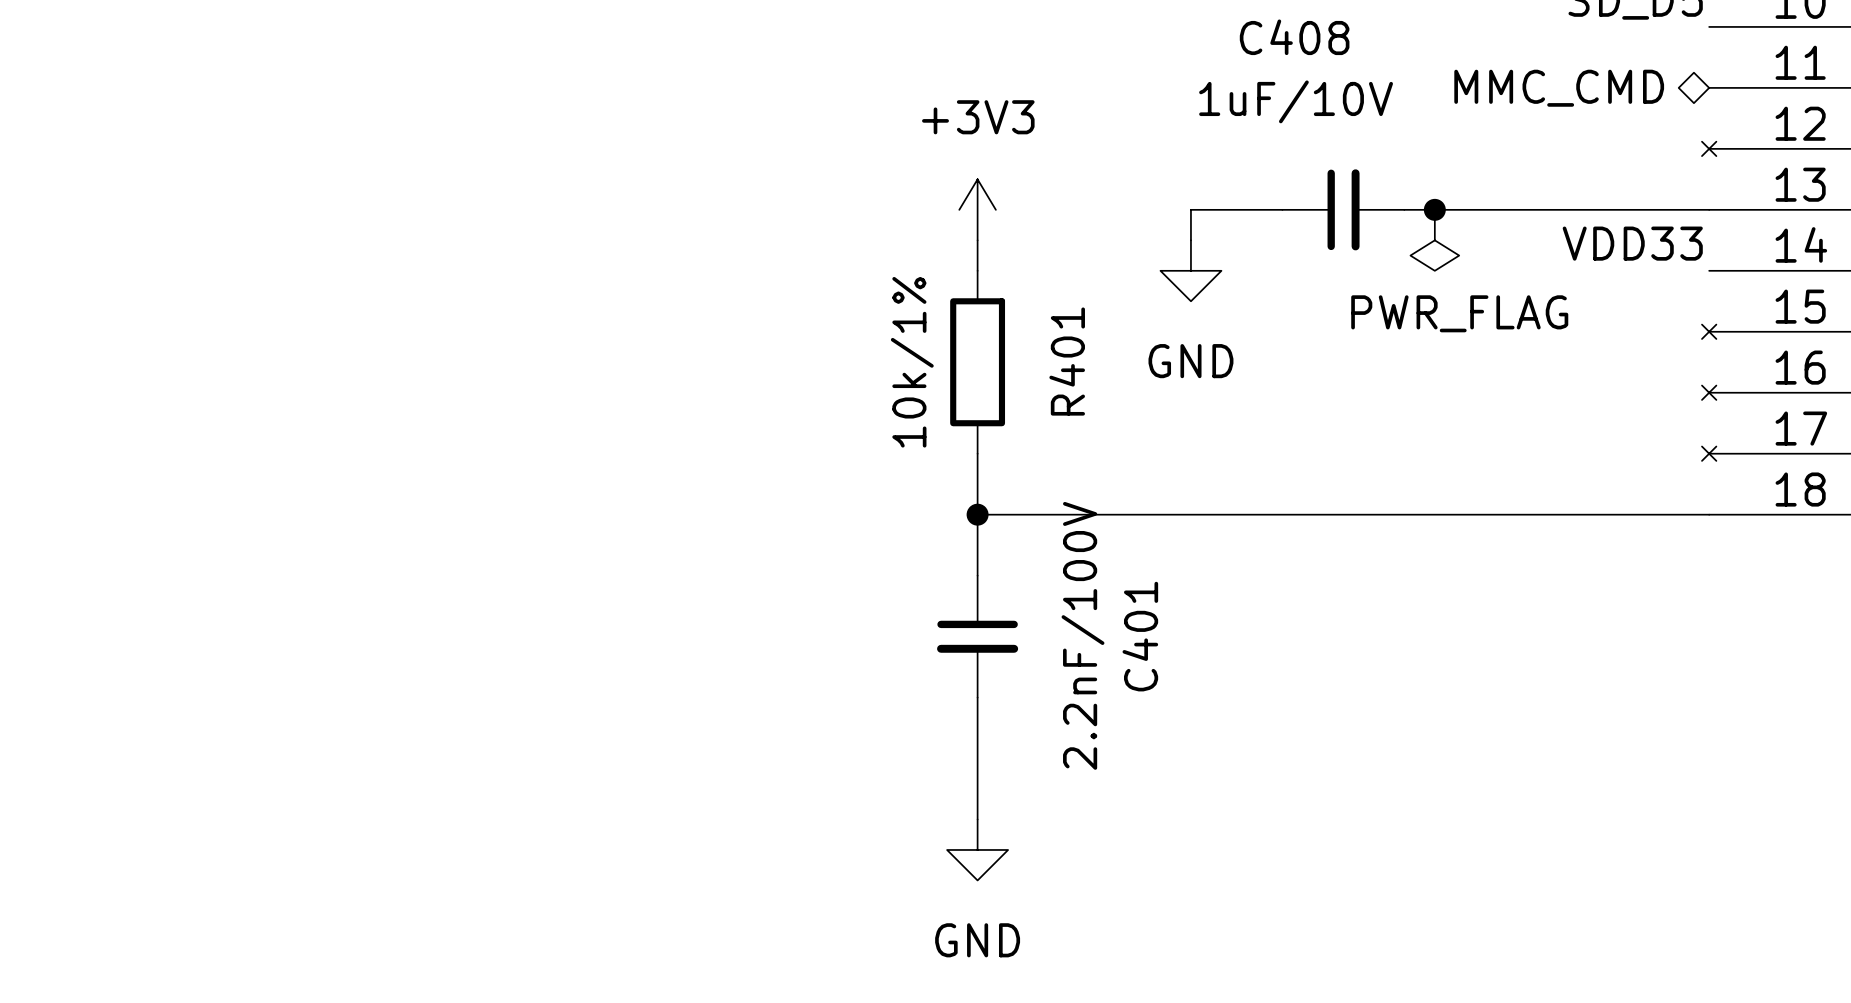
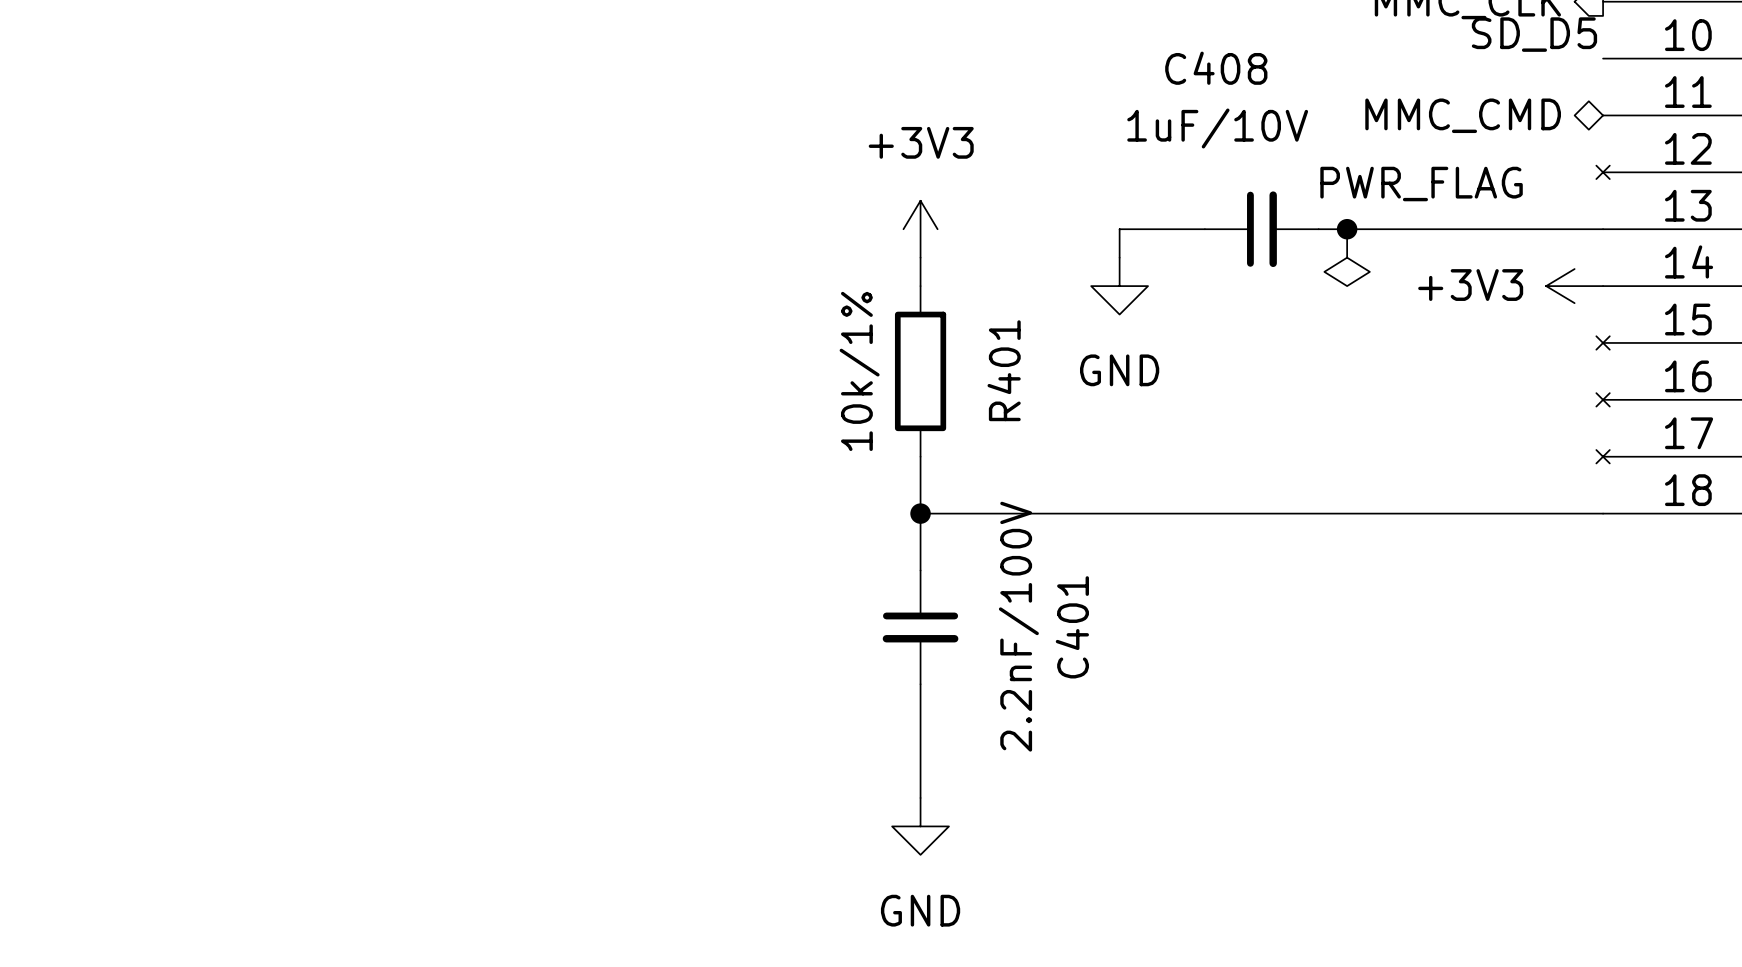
label: VDD33 (1632, 243) -> none
power symbol: none -> +3V3 (1574, 286)
power symbol text position: PWR_FLAG (1459, 313) -> PWR_FLAG (1421, 184)

